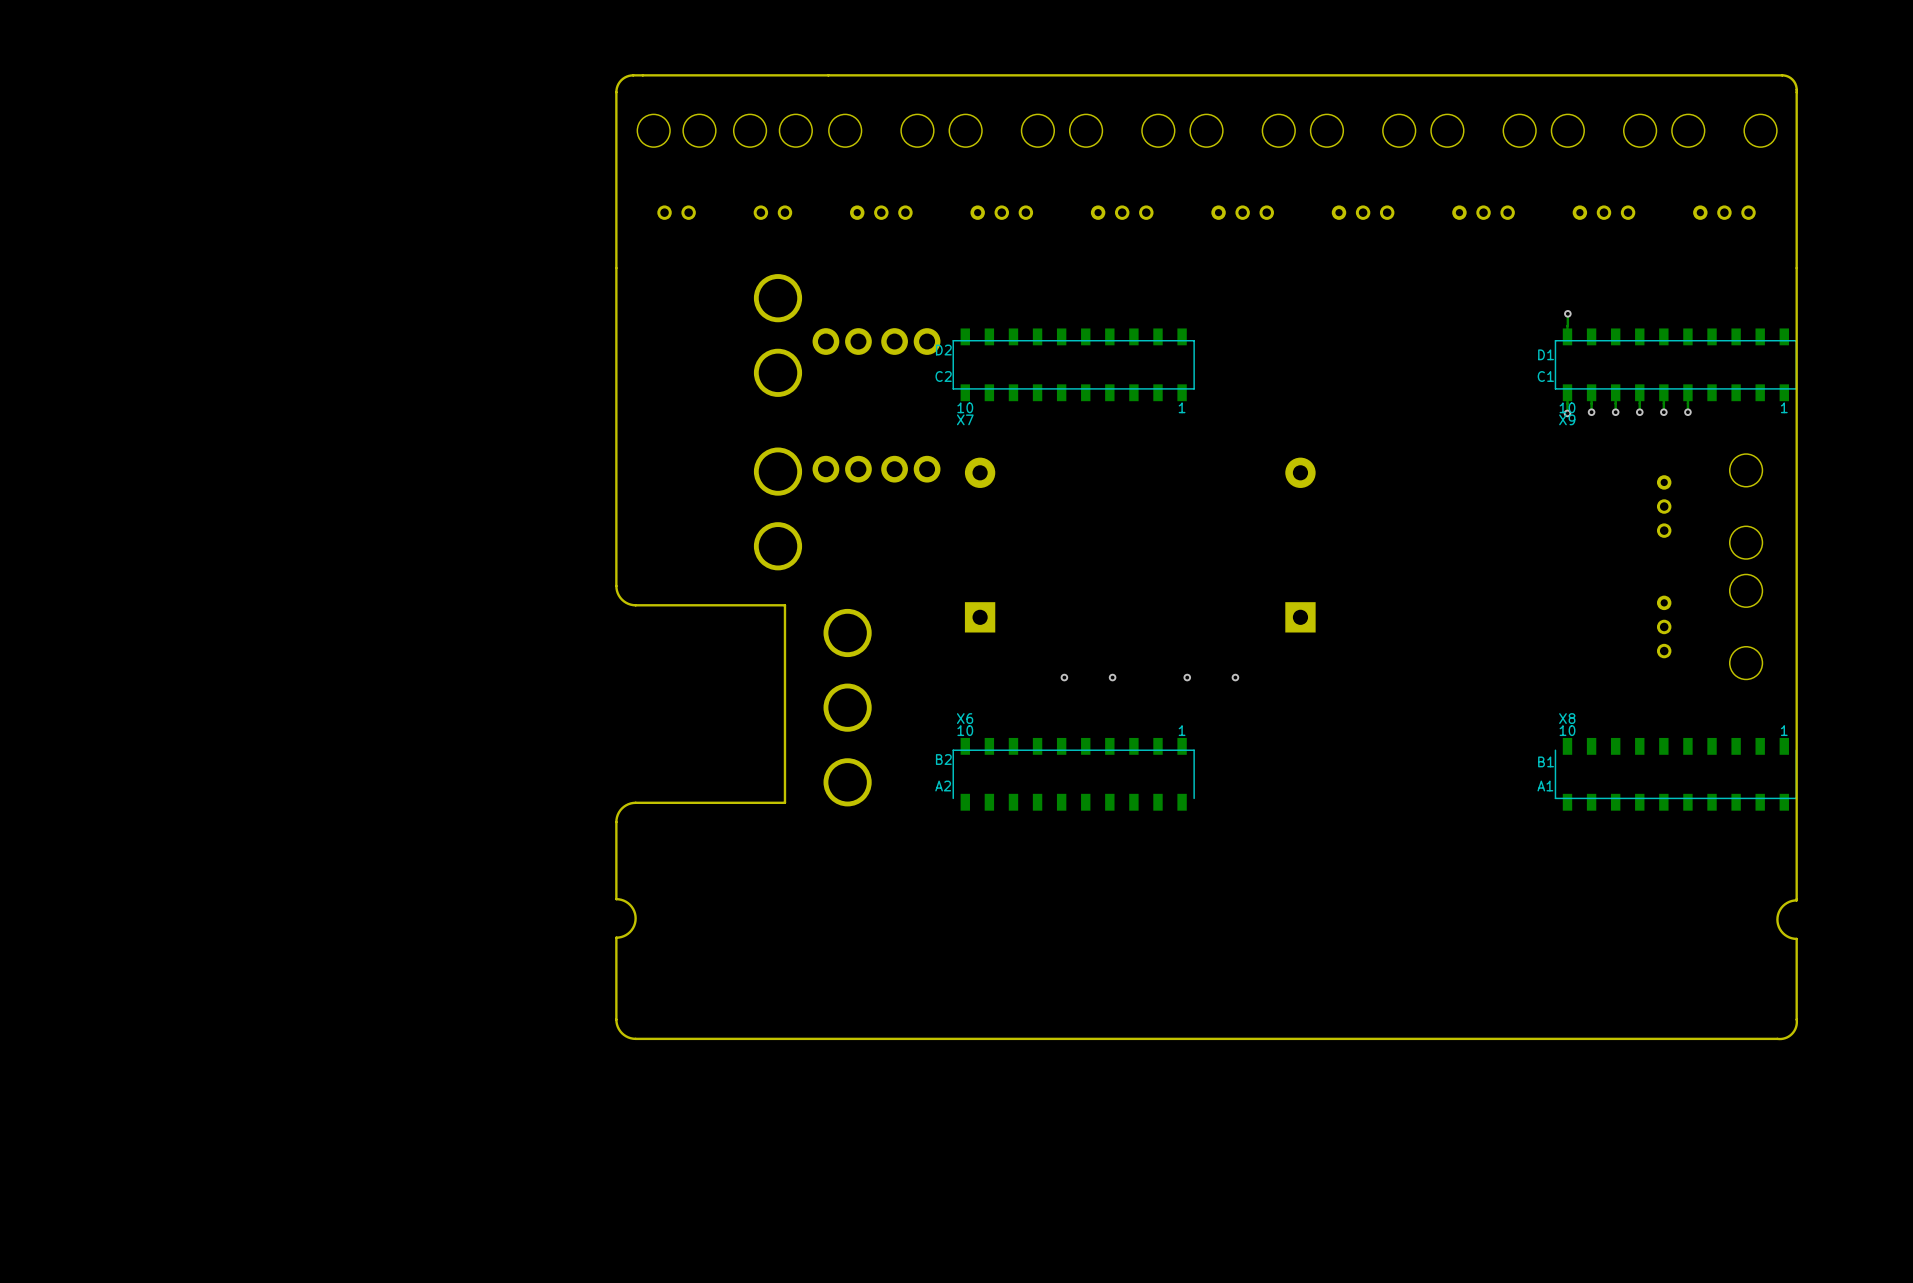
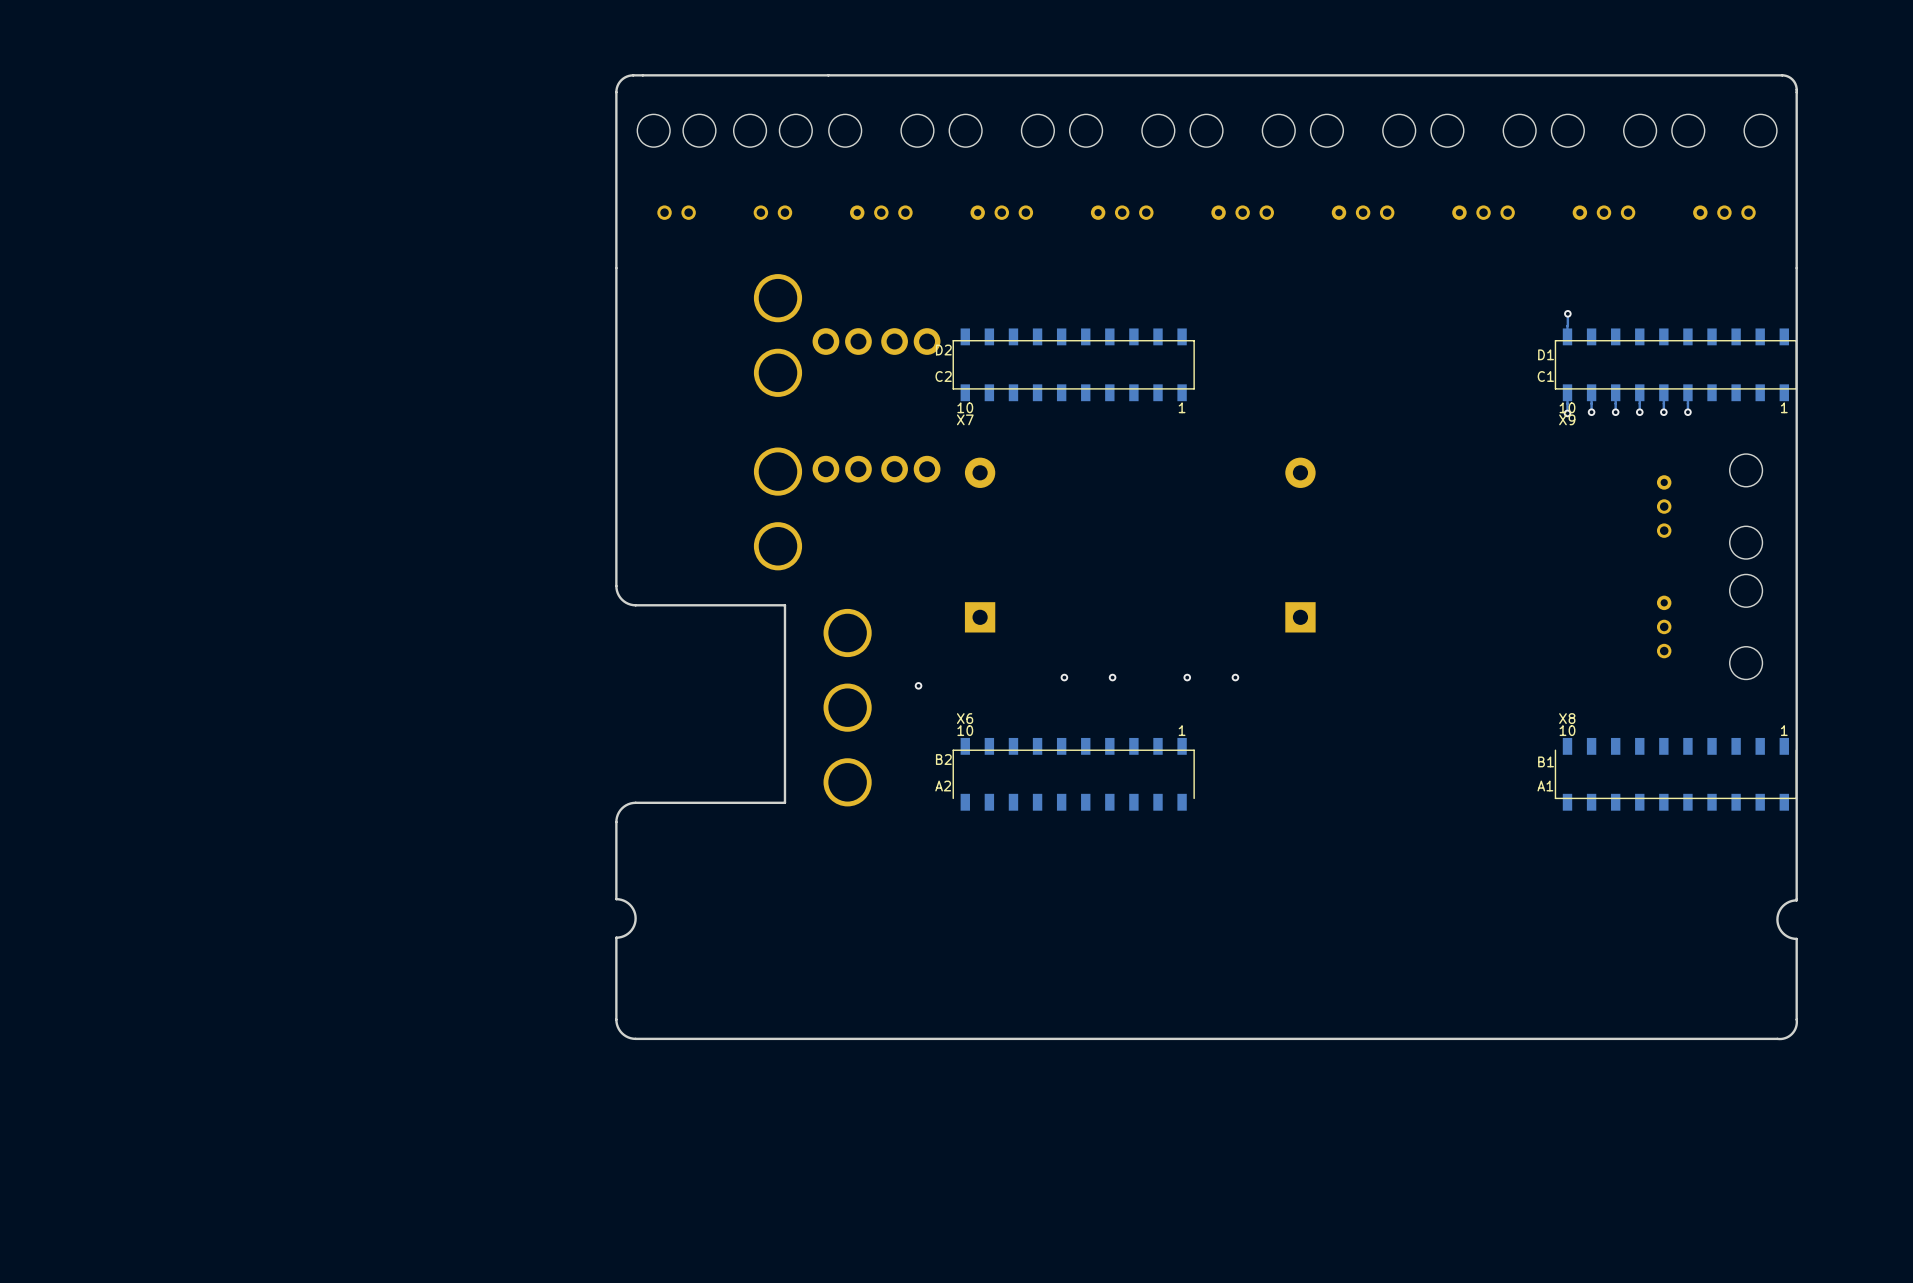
via: none -> (918, 685)

